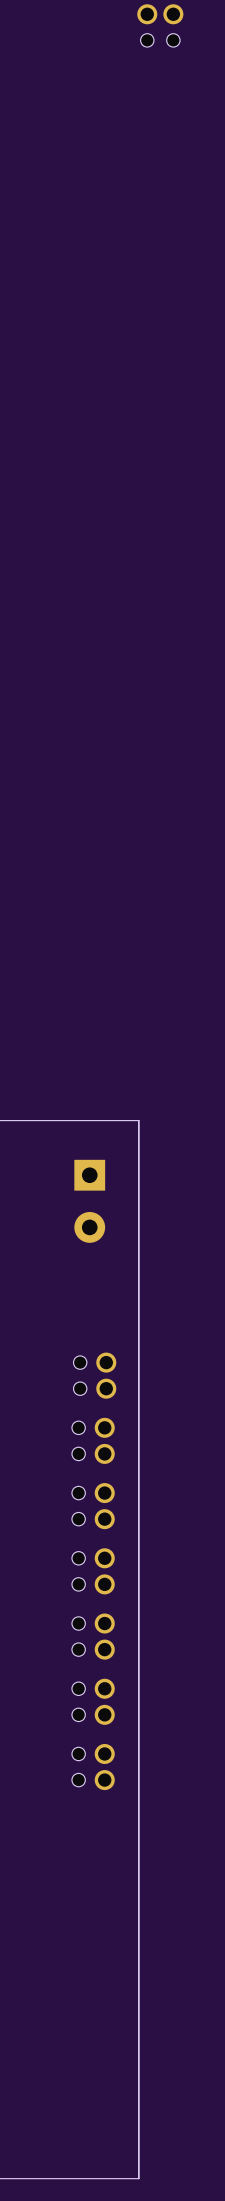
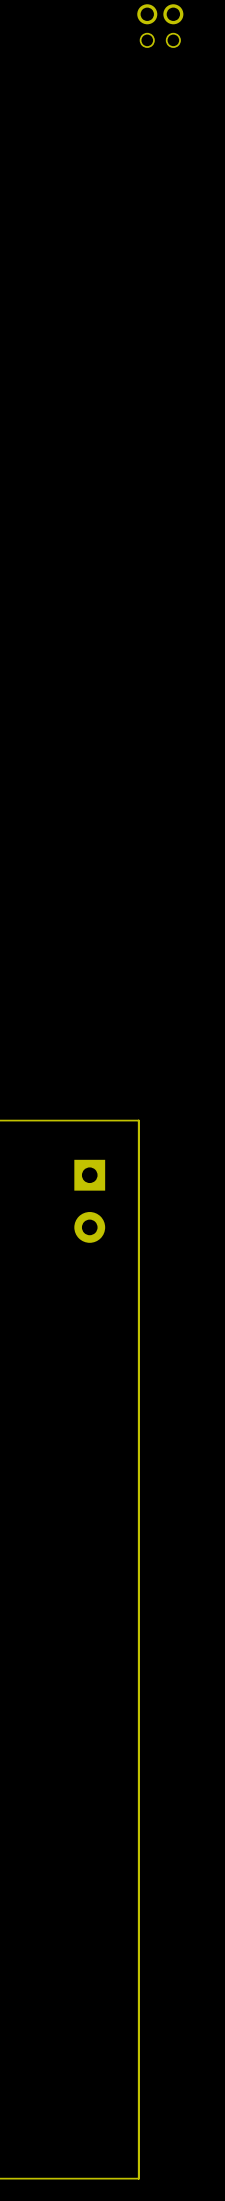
part: (94, 1375) -> none
part: (93, 1440) -> none
part: (93, 1506) -> none
part: (93, 1571) -> none
part: (93, 1636) -> none
part: (93, 1701) -> none
part: (93, 1767) -> none

